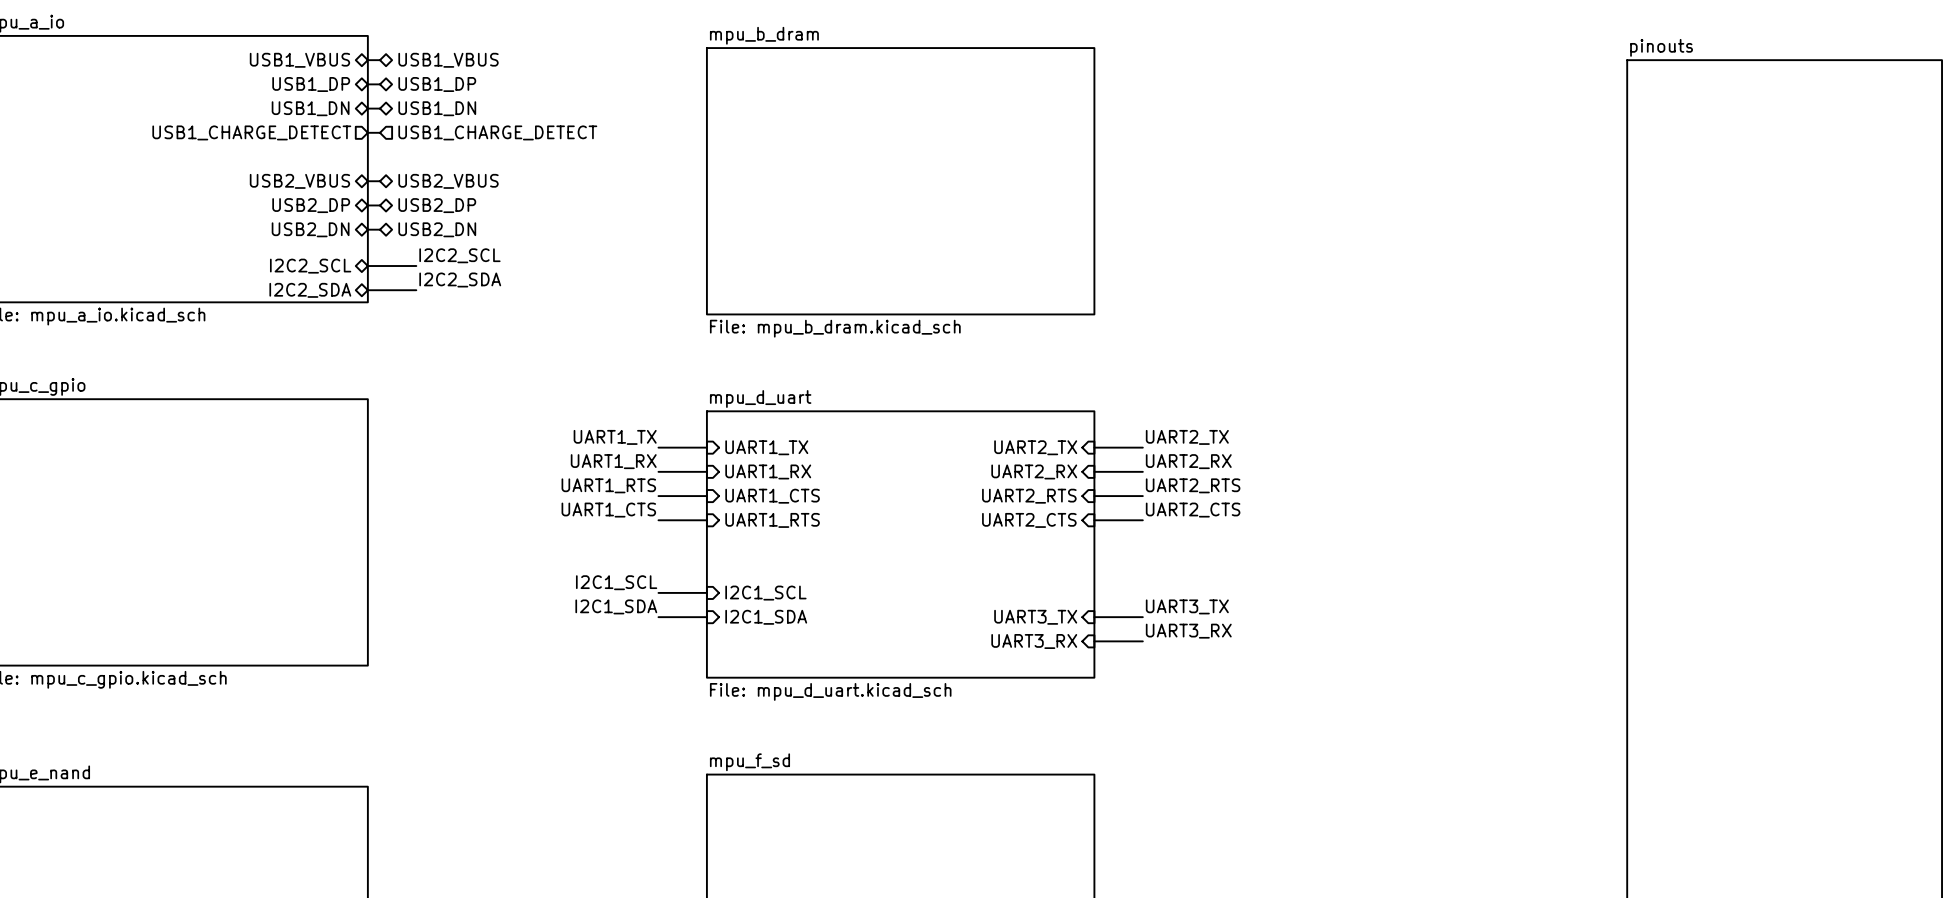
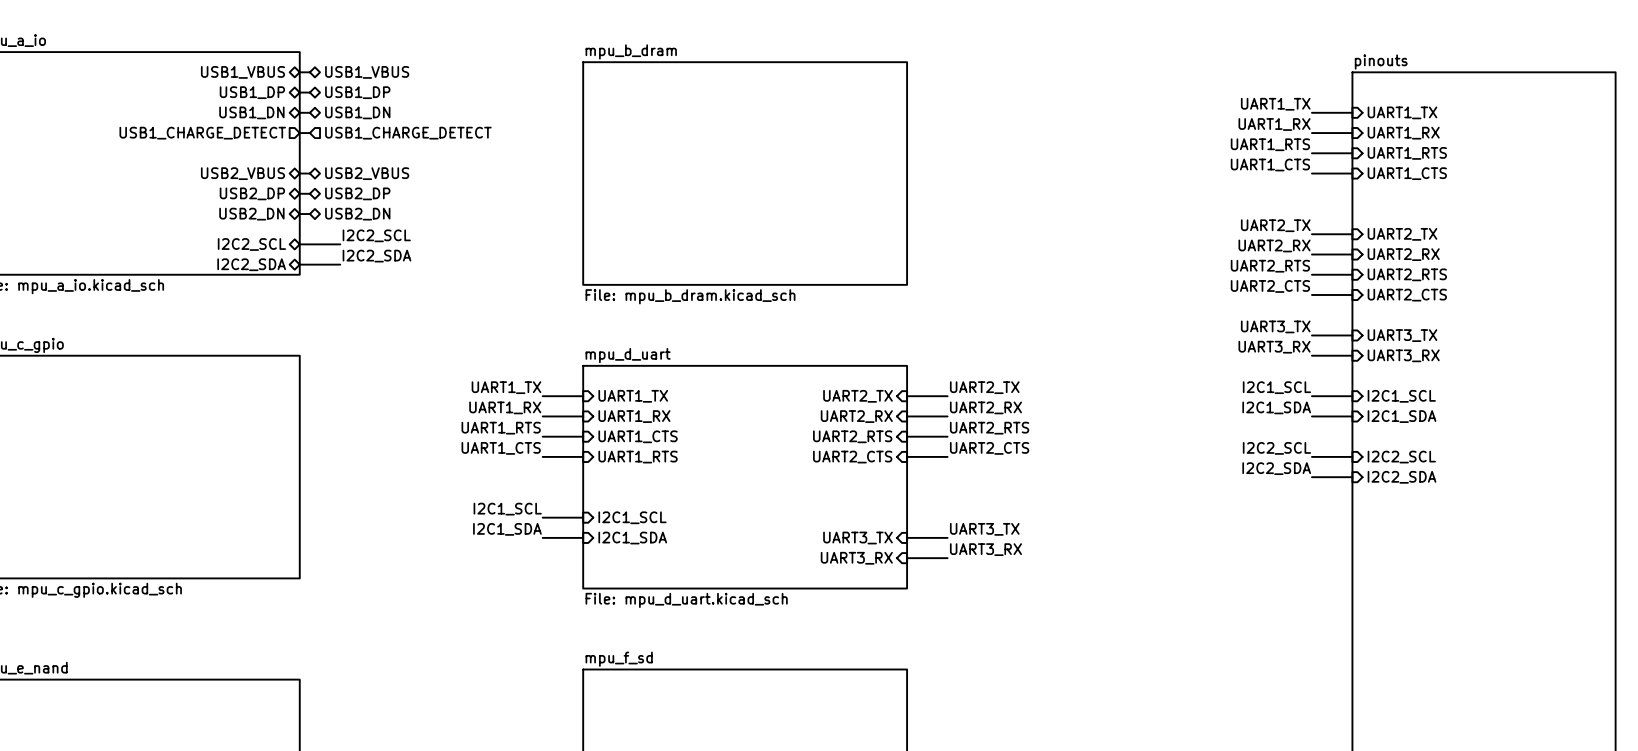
label: none -> UART1_TX (1275, 104)
wire: none -> (1311, 112) (1352, 112)
sheet pin: none -> UART1_TX (1402, 112)
label: none -> UART1_RX (1274, 124)
wire: none -> (1311, 133) (1352, 133)
sheet pin: none -> UART1_RX (1403, 133)
label: none -> UART1_RTS (1270, 144)
wire: none -> (1311, 153) (1352, 153)
sheet pin: none -> UART1_RTS (1407, 153)
label: none -> UART1_CTS (1270, 164)
wire: none -> (1311, 173) (1352, 173)
sheet pin: none -> UART1_CTS (1407, 173)
label: none -> UART2_TX (1275, 225)
wire: none -> (1311, 234) (1352, 234)
sheet pin: none -> UART2_TX (1402, 234)
label: none -> UART2_RX (1274, 245)
wire: none -> (1311, 254) (1352, 254)
sheet pin: none -> UART2_RX (1403, 254)
label: none -> UART2_RTS (1270, 266)
wire: none -> (1311, 274) (1352, 274)
sheet pin: none -> UART2_RTS (1407, 274)
label: none -> UART2_CTS (1270, 286)
wire: none -> (1311, 294) (1352, 294)
sheet pin: none -> UART2_CTS (1407, 295)
label: none -> UART3_TX (1275, 326)
wire: none -> (1311, 335) (1352, 335)
sheet pin: none -> UART3_TX (1402, 335)
label: none -> UART3_RX (1274, 347)
wire: none -> (1311, 355) (1352, 355)
sheet pin: none -> UART3_RX (1403, 355)
label: none -> I2C1_SCL (1276, 387)
wire: none -> (1311, 396) (1352, 396)
sheet pin: none -> I2C1_SCL (1401, 396)
label: none -> I2C1_SDA (1276, 407)
wire: none -> (1311, 416) (1352, 416)
sheet pin: none -> I2C1_SDA (1402, 416)
label: none -> I2C2_SCL (1276, 448)
wire: none -> (1311, 456) (1352, 456)
sheet pin: none -> I2C2_SCL (1401, 457)
label: none -> I2C2_SDA (1276, 468)
wire: none -> (1311, 477) (1352, 477)
sheet pin: none -> I2C2_SDA (1402, 477)

